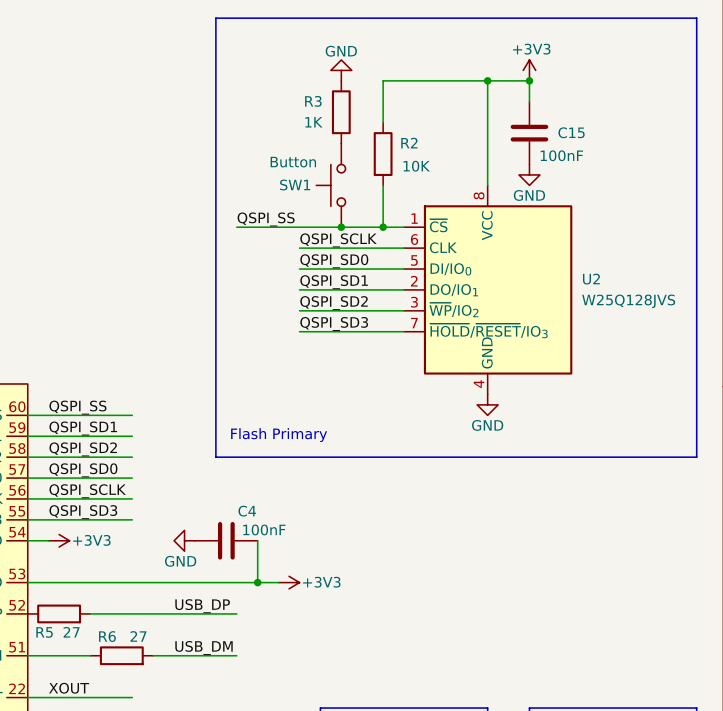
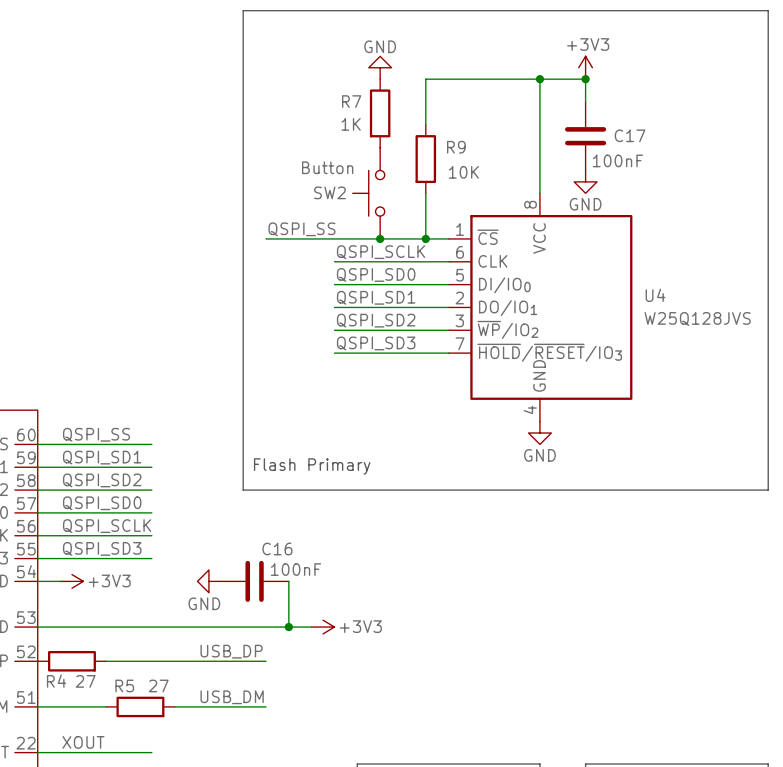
R3 name: R3 (313, 101) -> R7 (351, 101)
C15 name: C15 (571, 132) -> C17 (630, 135)
R2 name: R2 (409, 143) -> R9 (456, 147)
SW1 name: SW1 (295, 185) -> SW2 (329, 192)
U2 name: U2 (591, 279) -> U4 (655, 295)
C4 name: C4 (247, 511) -> C16 (277, 549)
R5 name: R5 (44, 632) -> R4 (56, 681)
R6 name: R6 (107, 636) -> R5 (124, 685)

